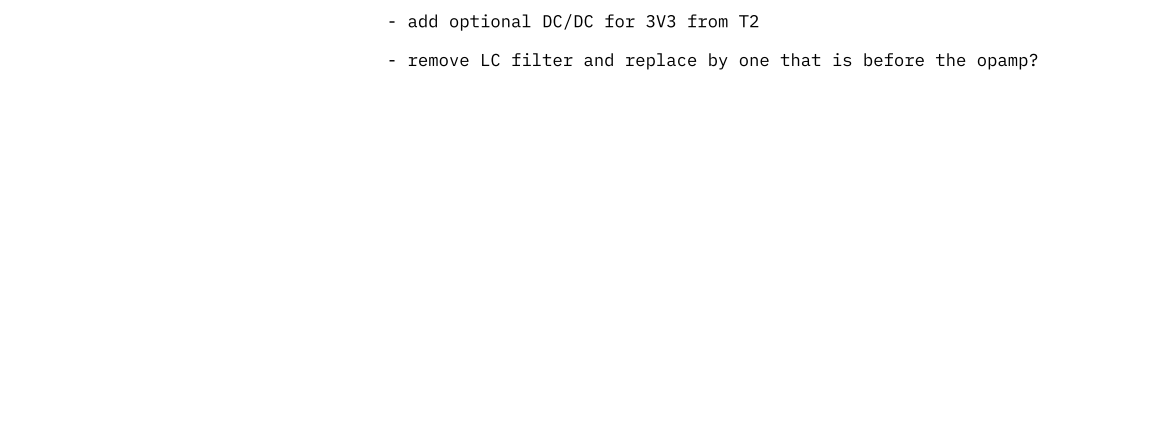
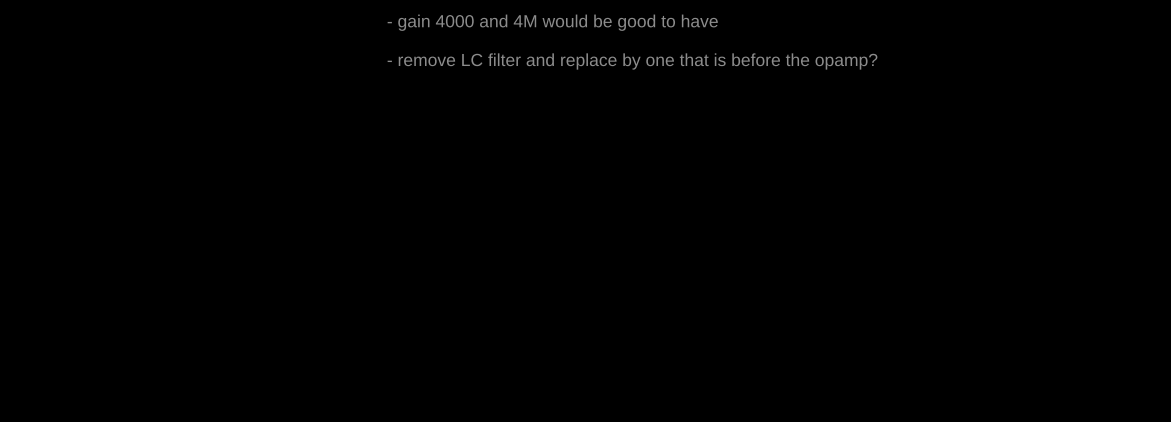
text: - add optional DC/DC for 3V3 from T2 (573, 22) -> - gain 4000 and 4M would be good to have (552, 22)

